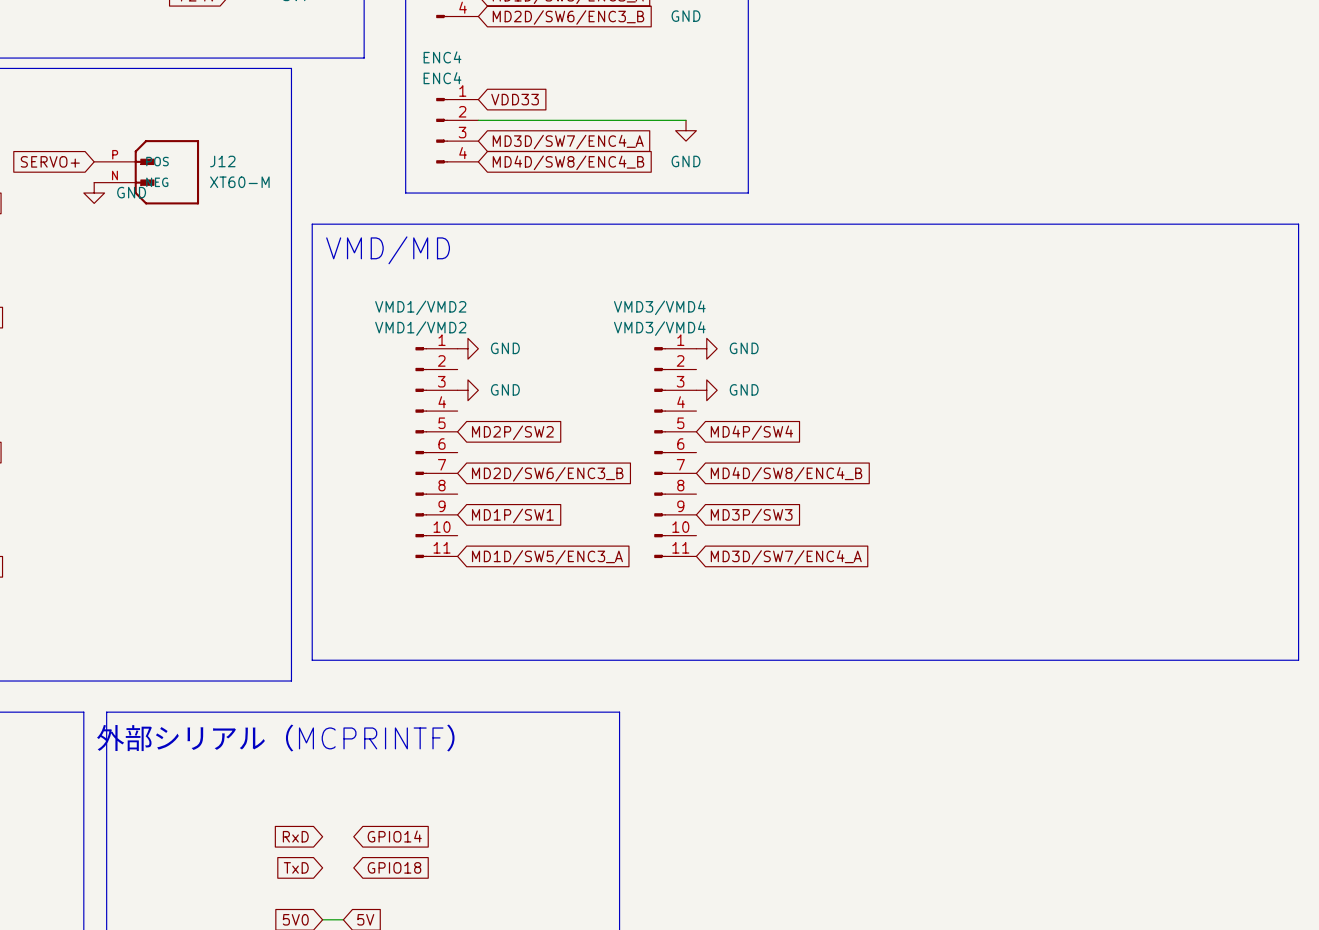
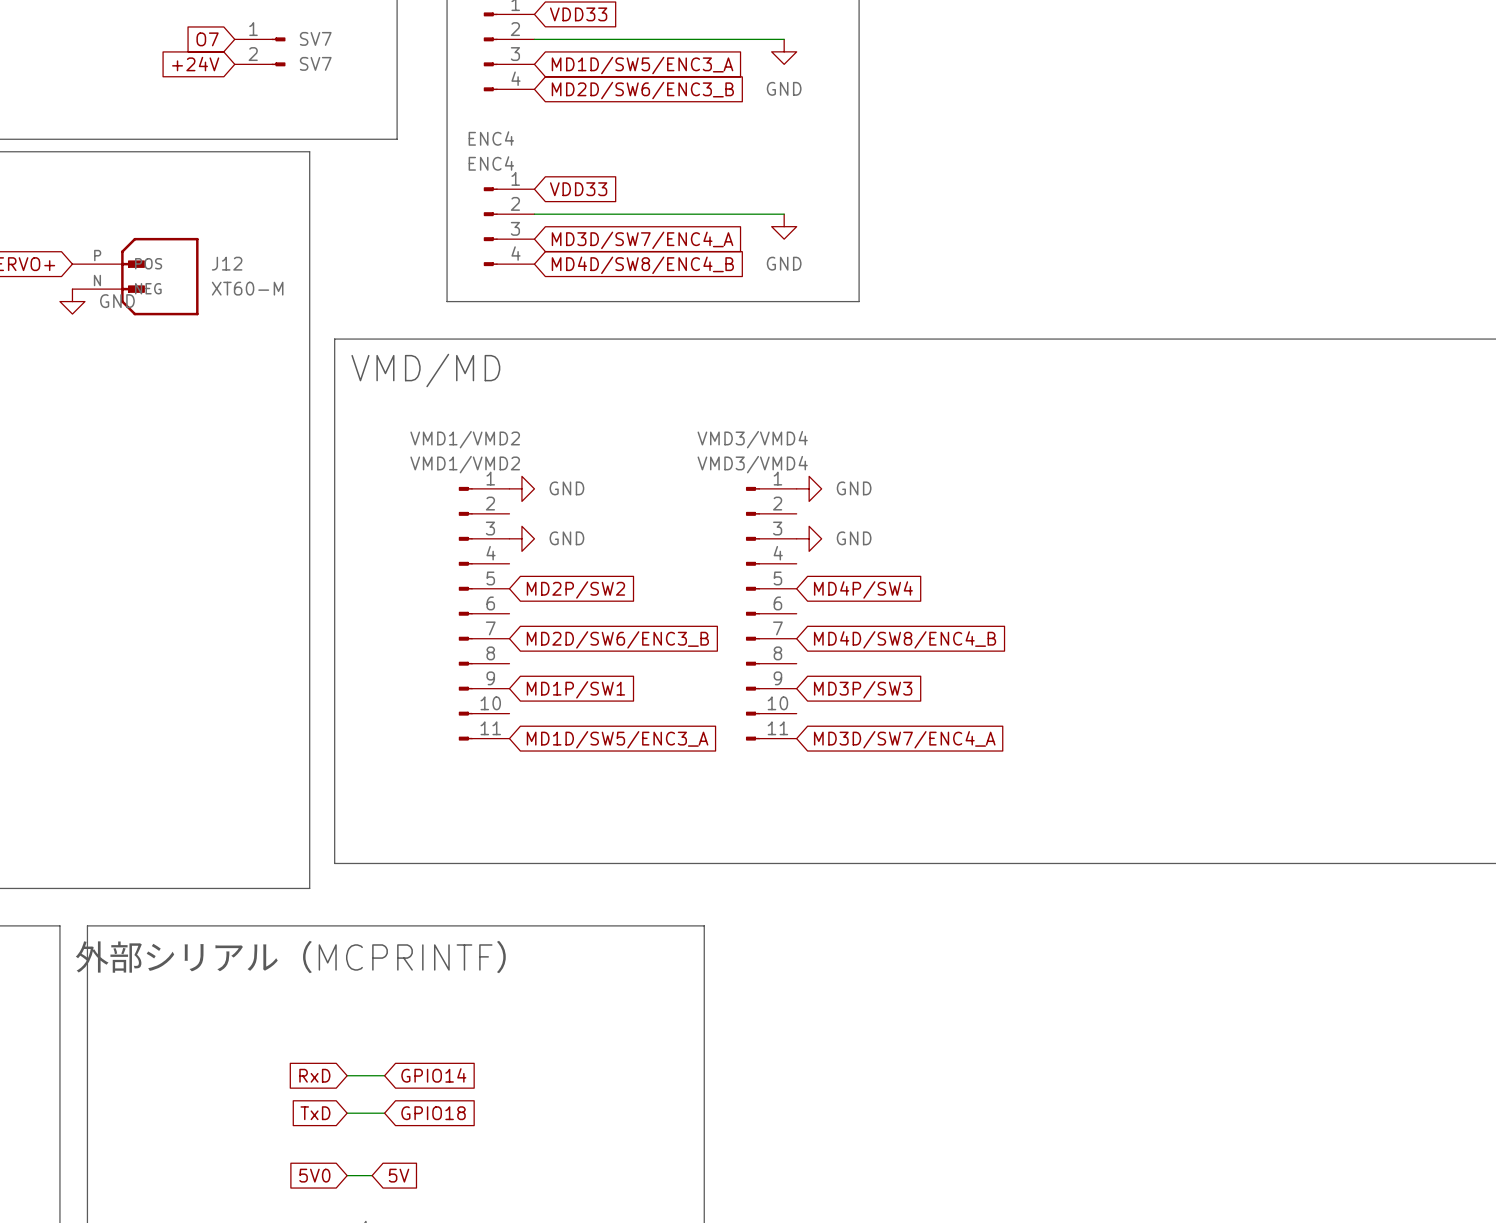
wire: none -> (347, 1075) (384, 1075)
wire: none -> (347, 1113) (384, 1113)

